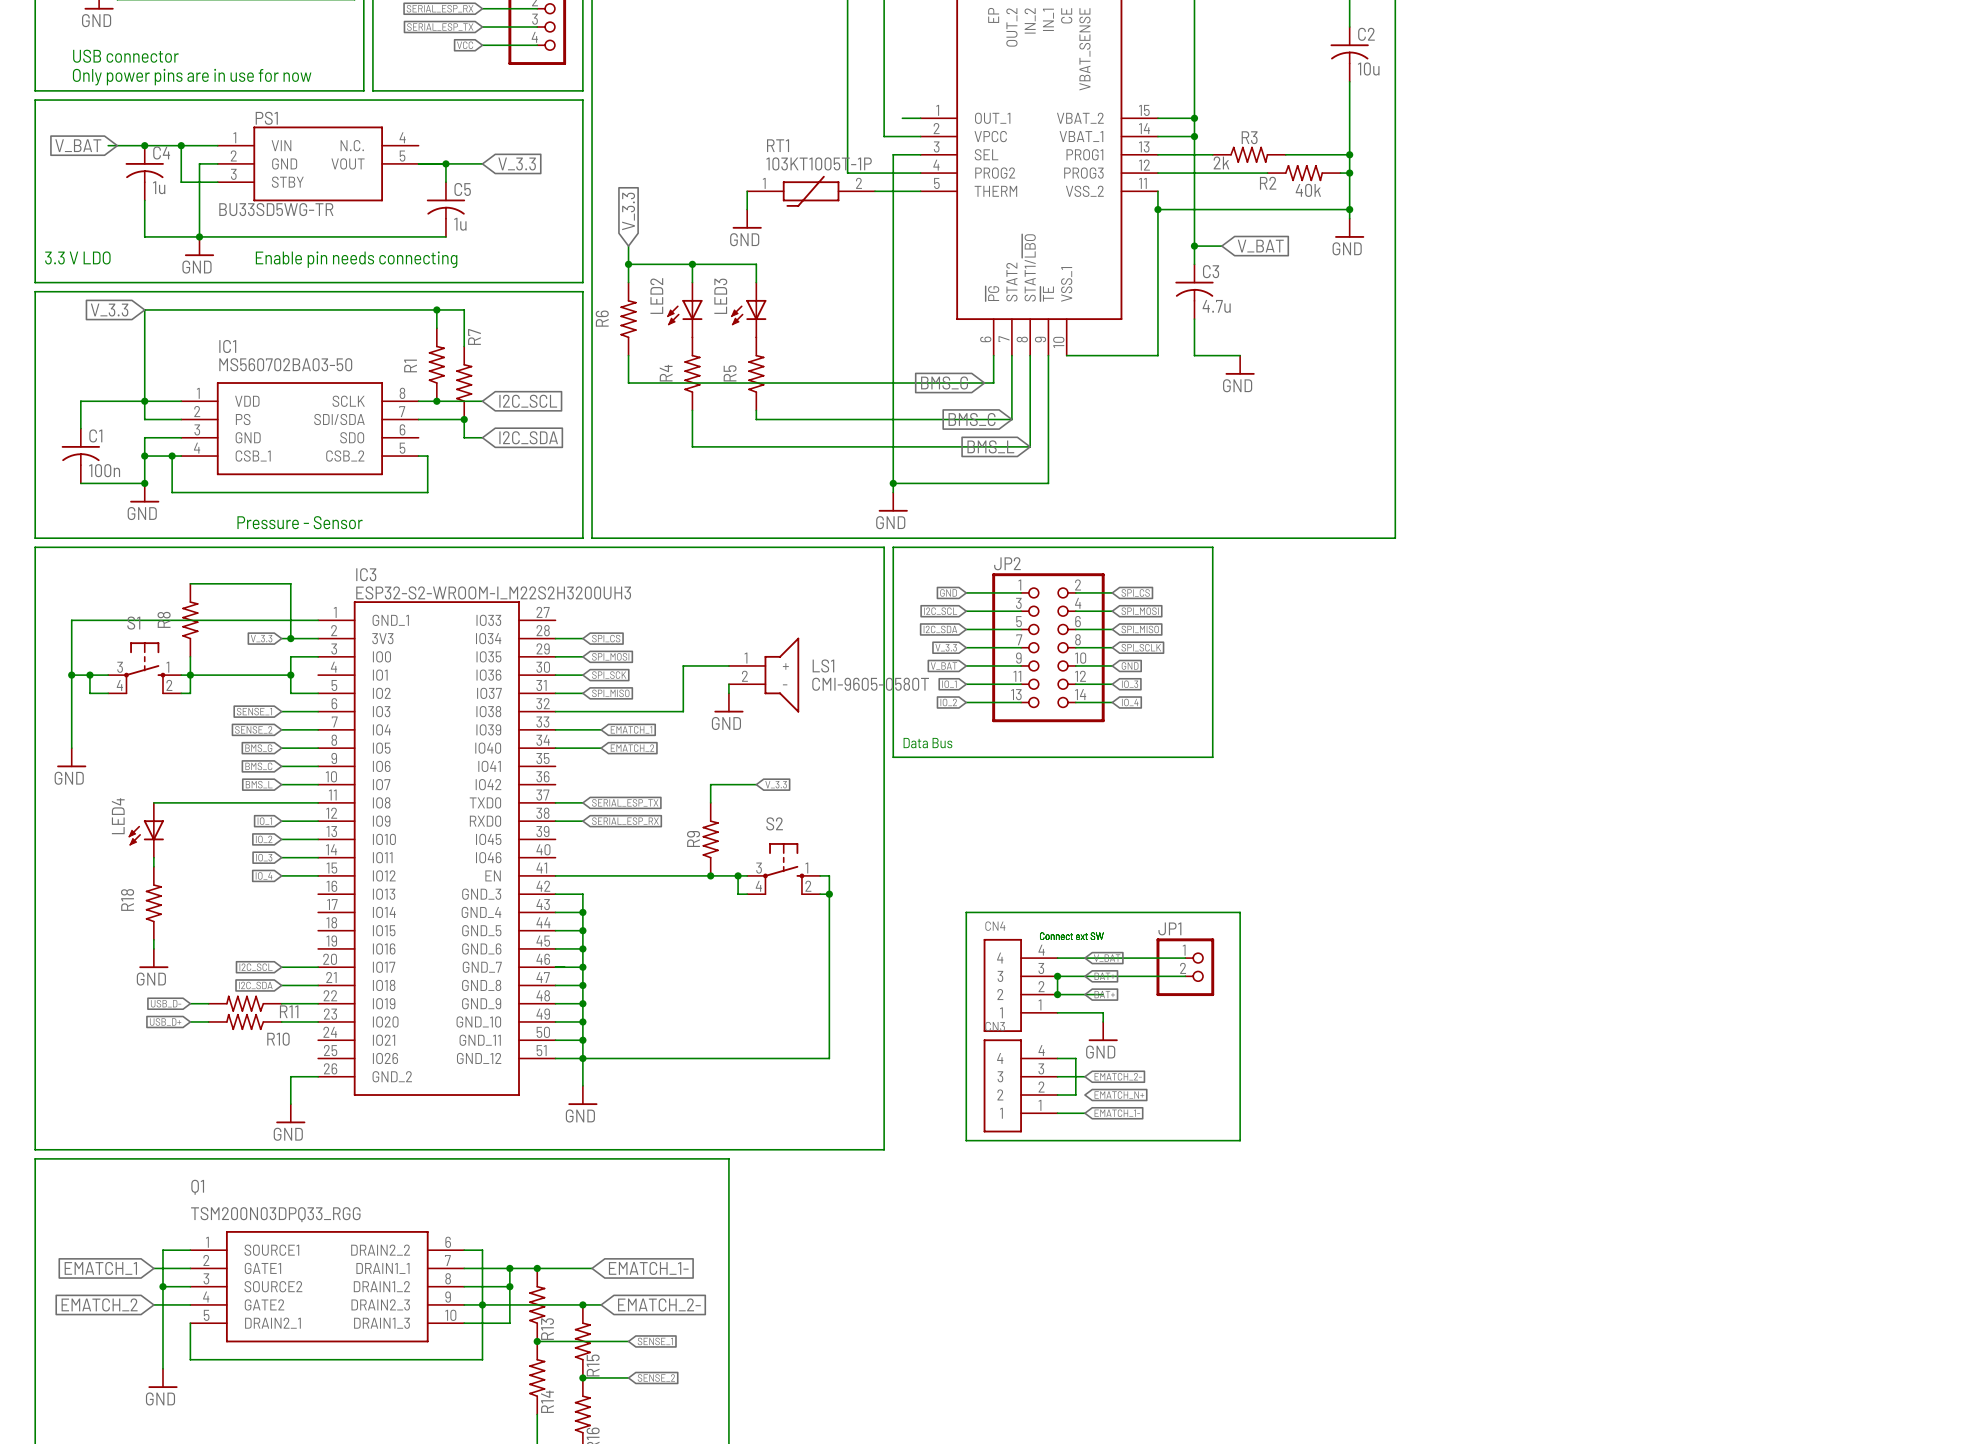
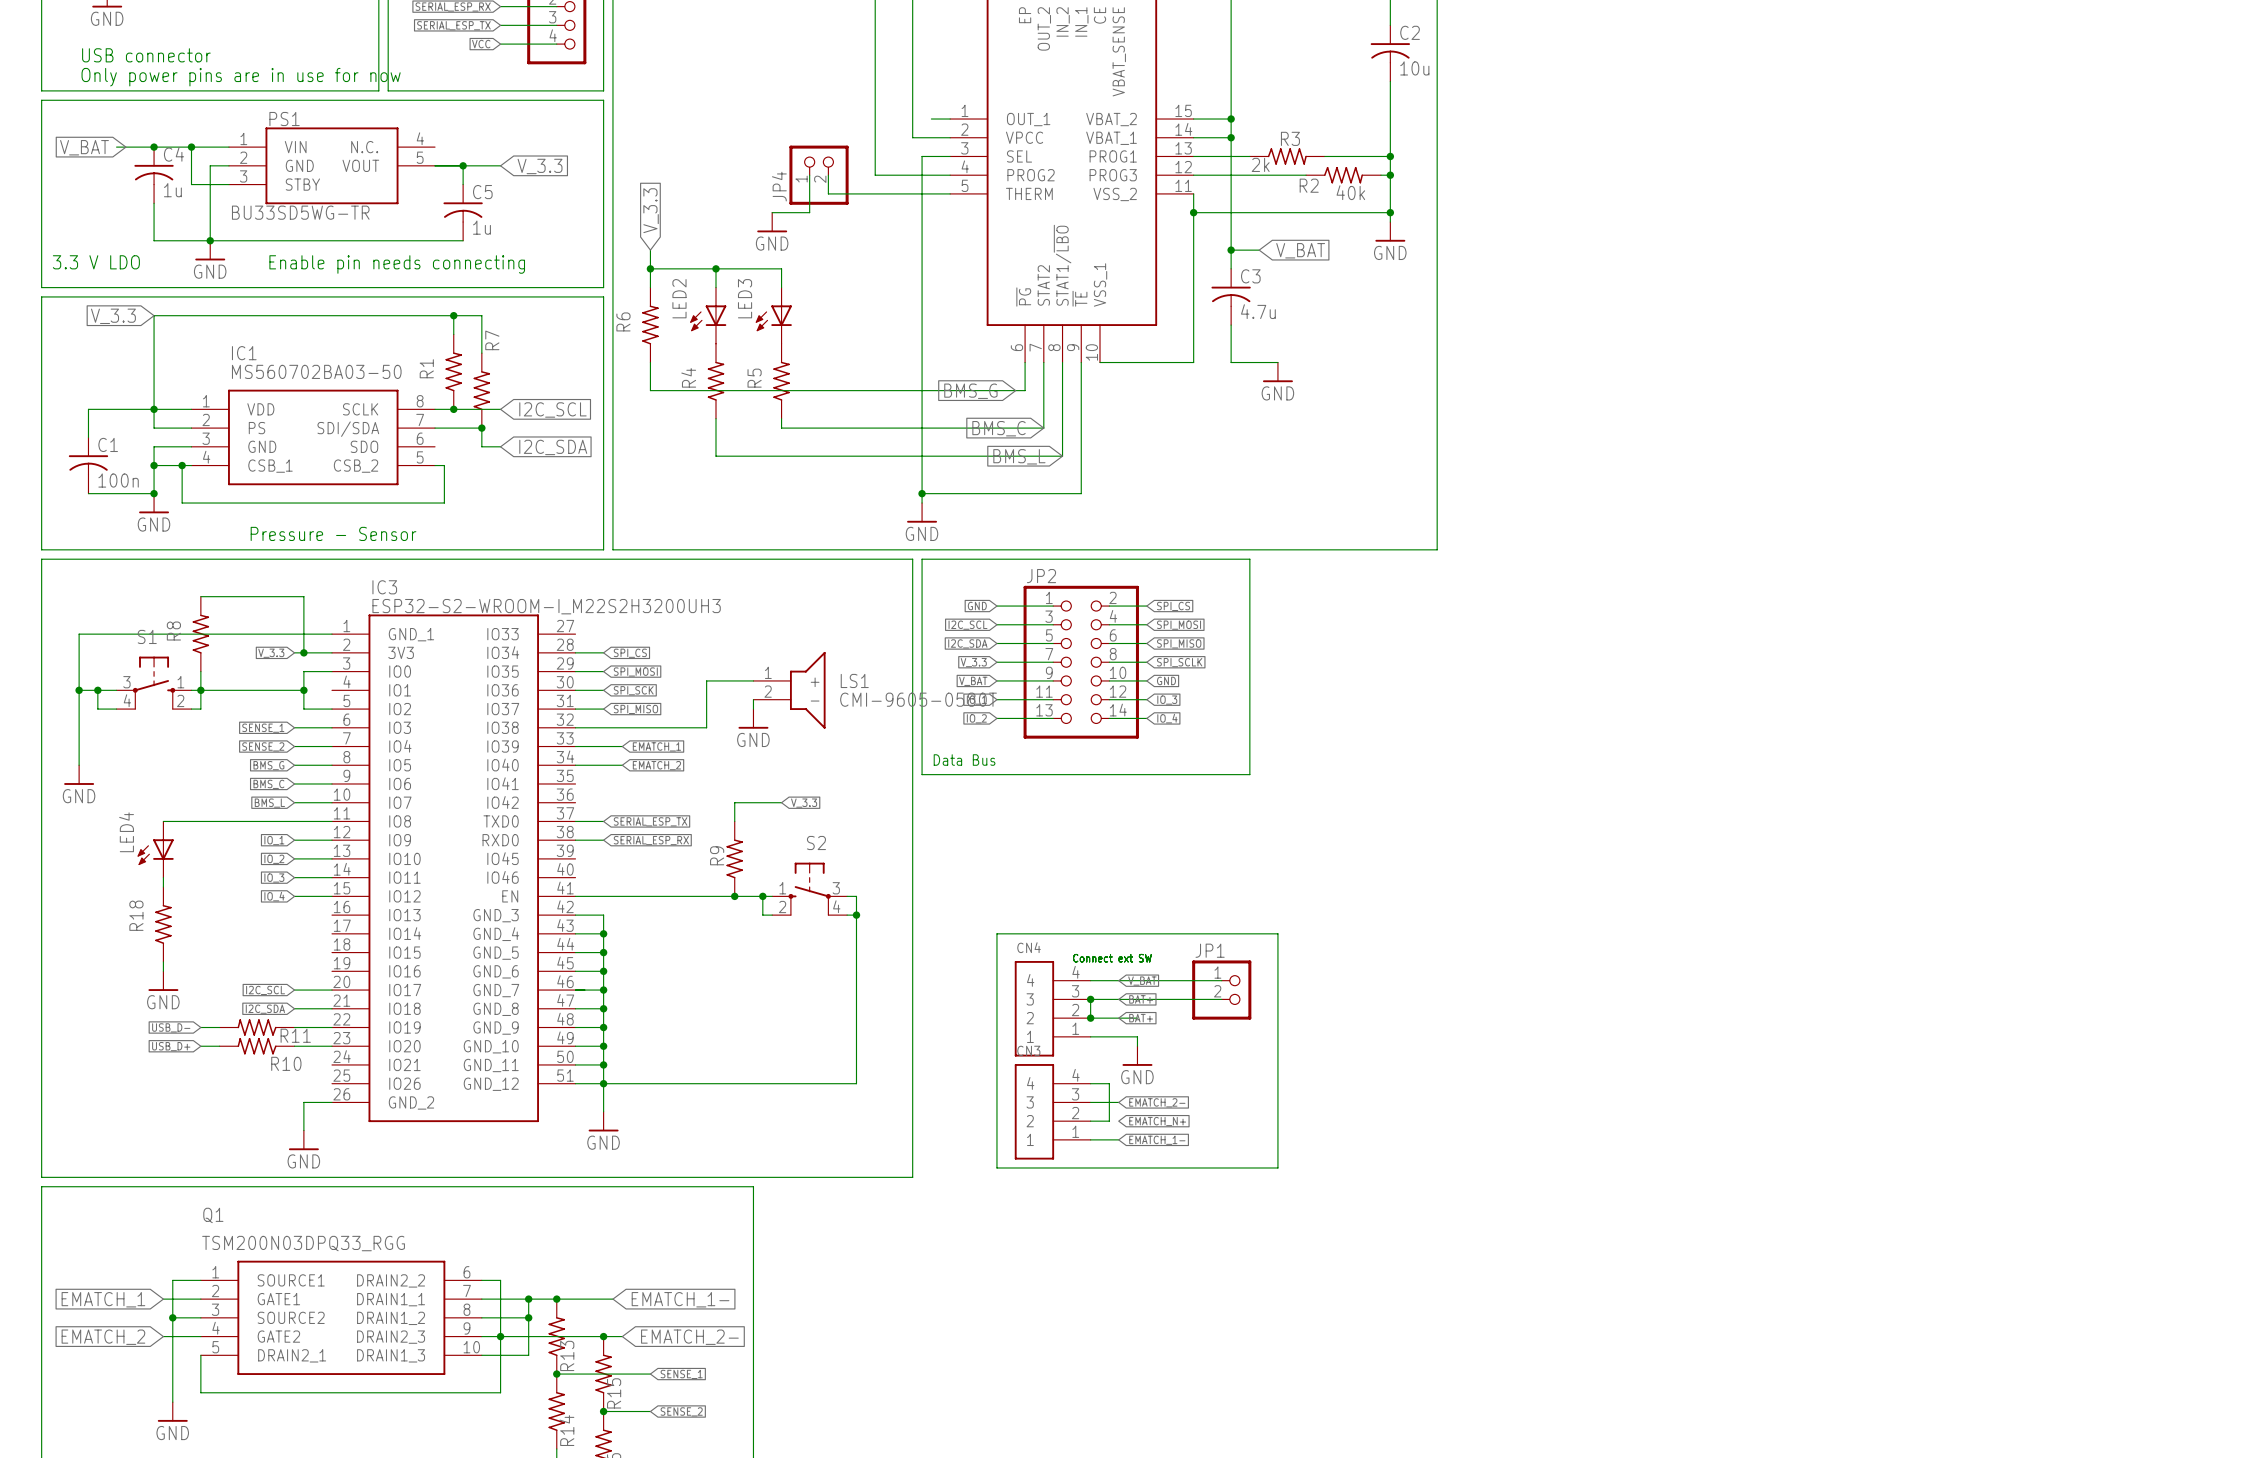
JP4: none -> (819, 175)
wire: none -> (828, 175) (828, 193) (903, 193)
wire: (747, 191) (747, 209) -> (809, 175) (809, 212) (772, 212)
RT1: 103KT1005T-1P (811, 191) -> none
S2 flip: as is (783, 868) -> left-right (809, 889)

